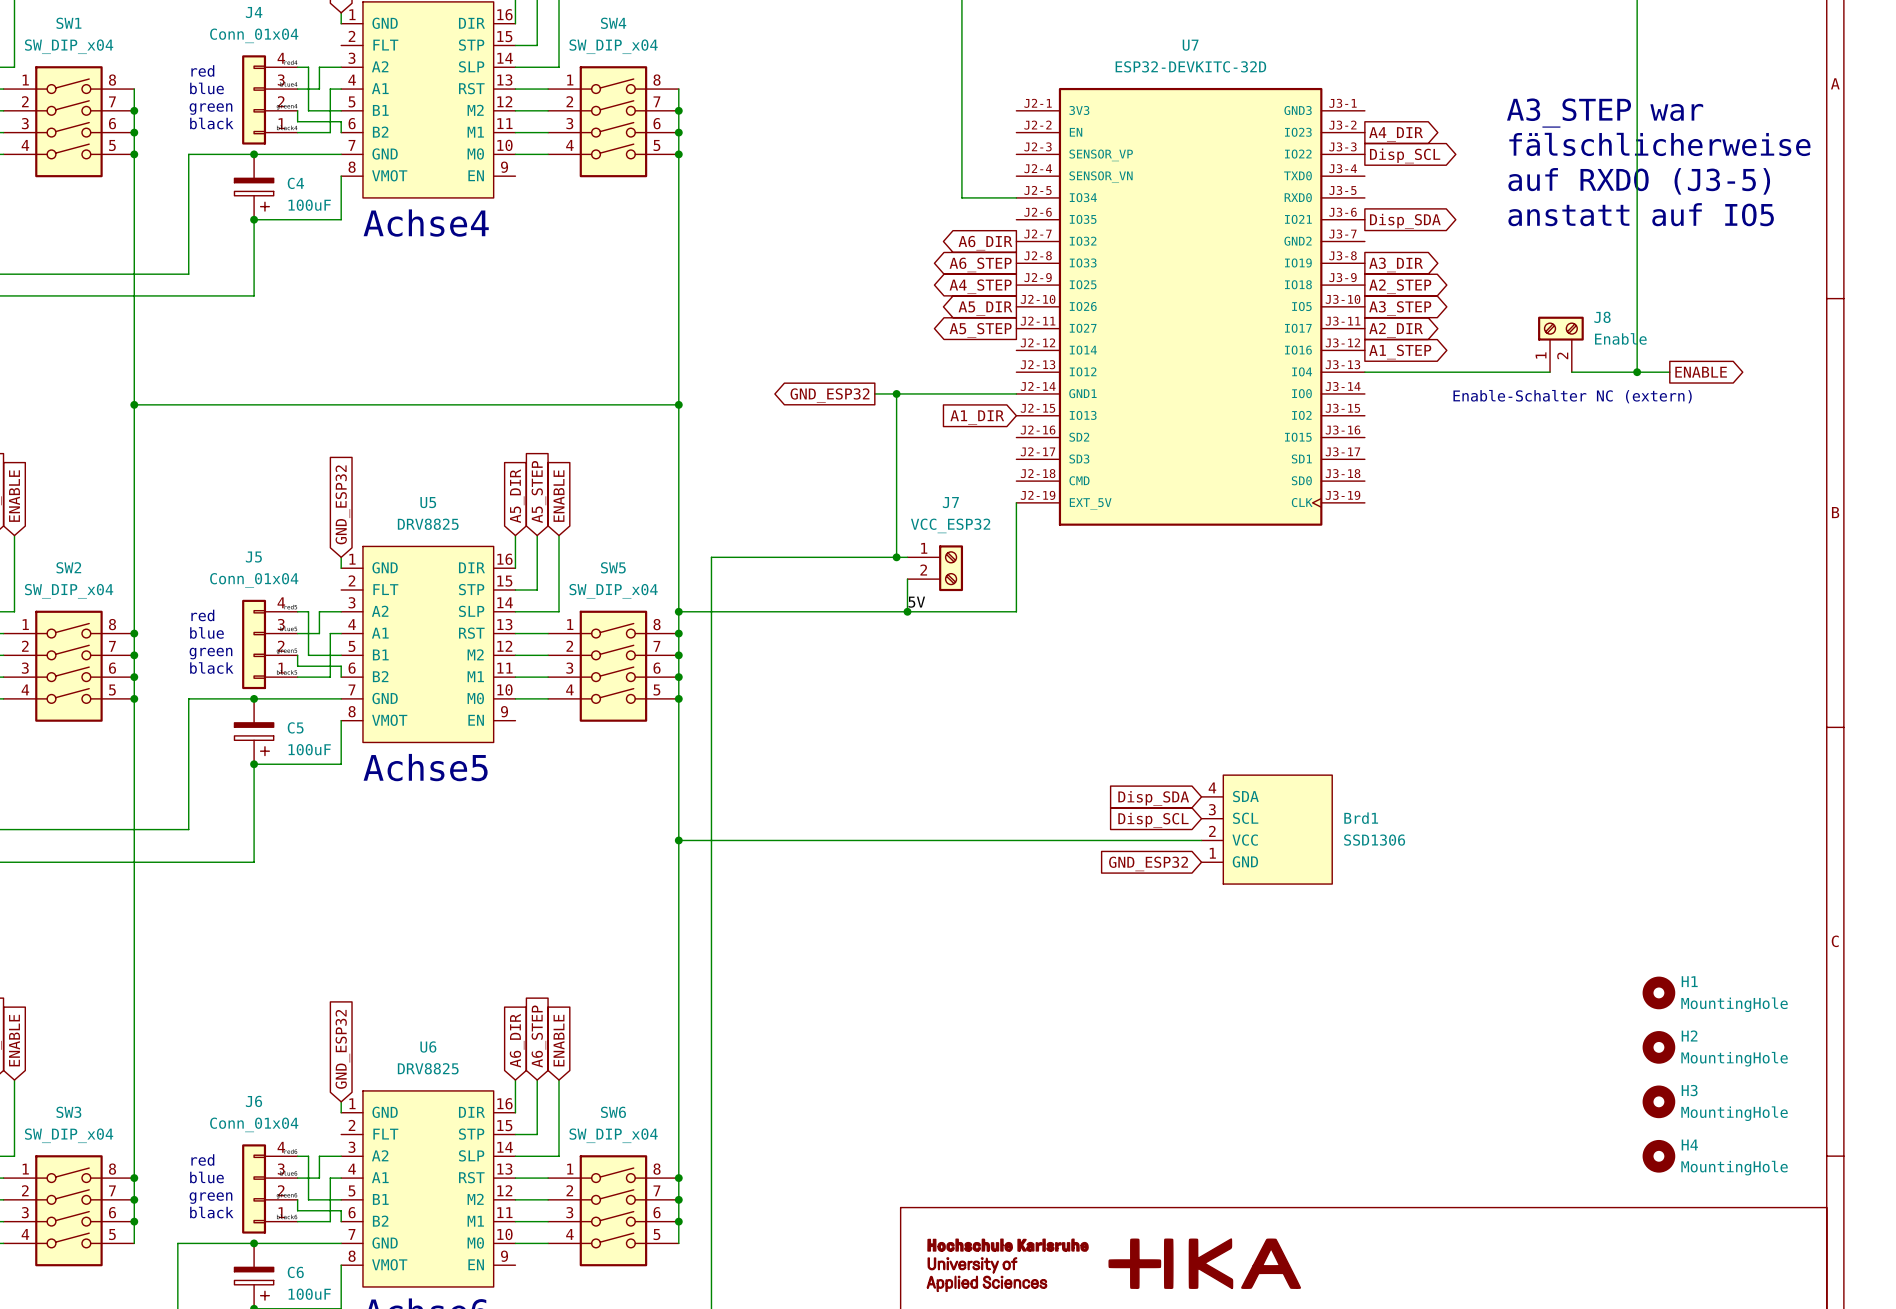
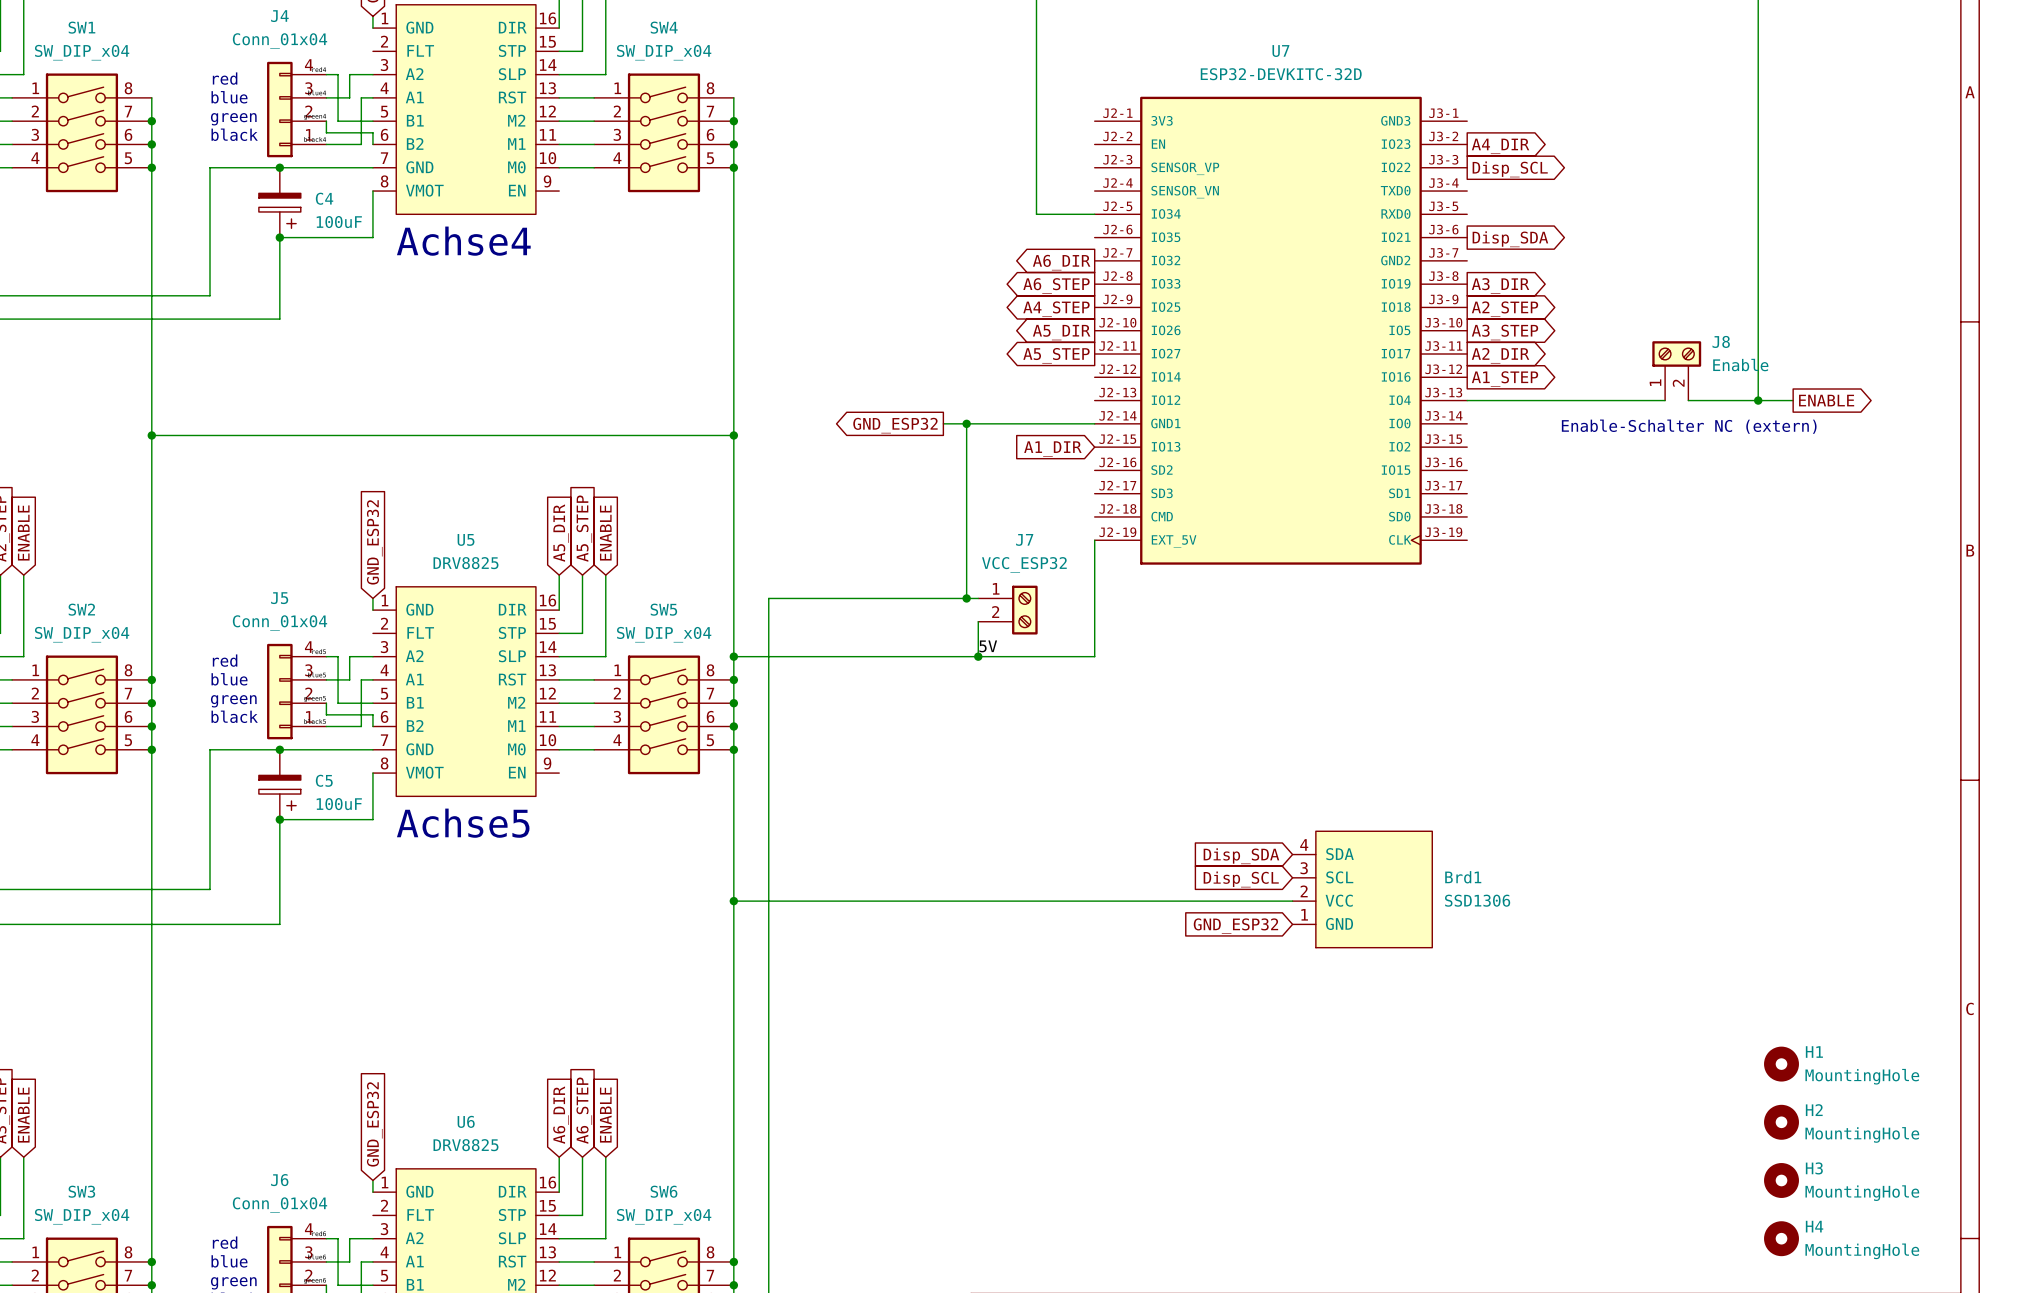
text: A3_STEP war (1605, 113) -> none
text: fälschlicherweise (1659, 144) -> none
text: auf RXDO (J3-5) (1639, 181) -> none
text: anstatt auf IO5 (1641, 214) -> none

